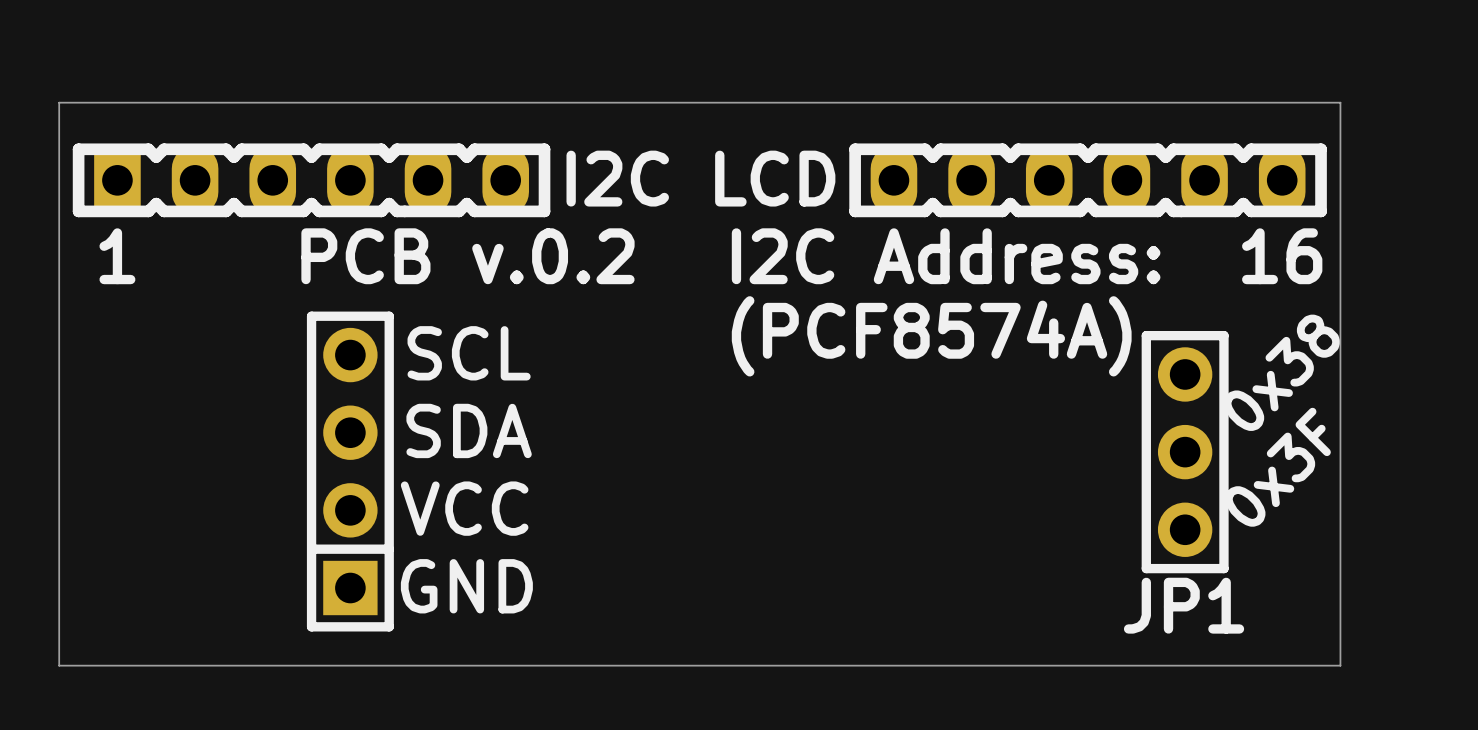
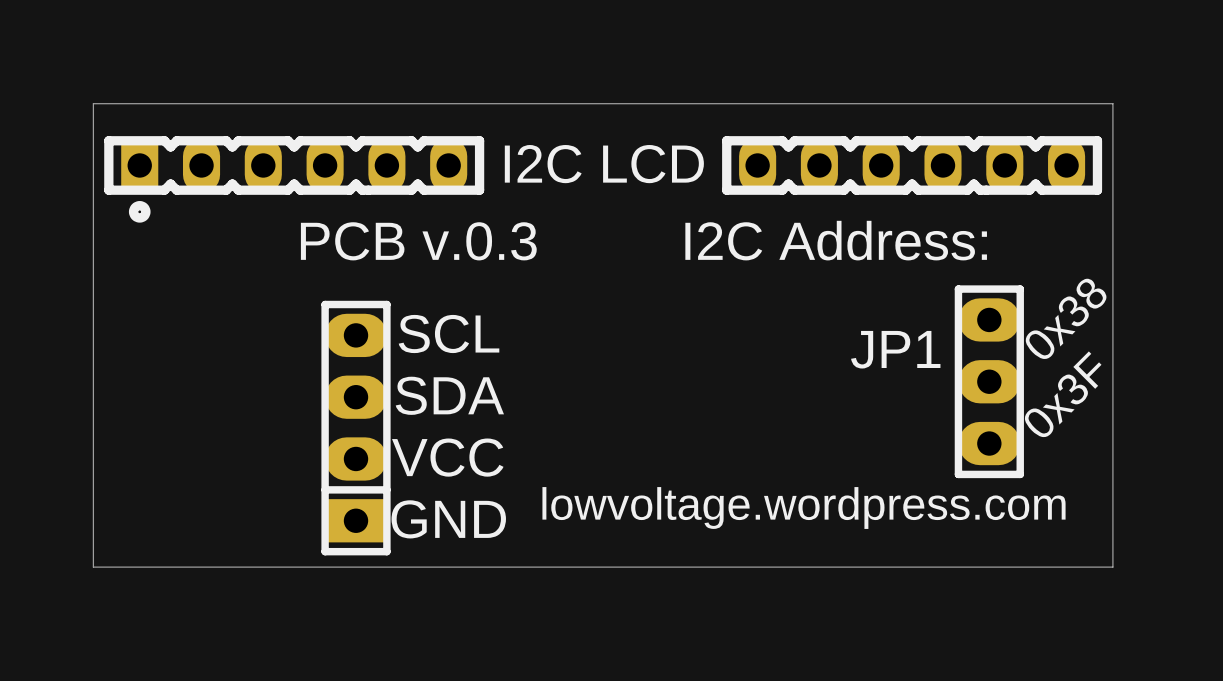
drawing: none -> [128, 201, 151, 223]
text: 1 (117, 256) -> none
text: PCB v.0.2 (467, 256) -> PCB v.0.3 (418, 241)
text position: I2C Address: (946, 256) -> I2C Address: (836, 240)
text: 16 (1282, 256) -> none
JP1 footprint: [1141, 330, 1229, 574] -> [954, 285, 1024, 479]
text: (PCF8574A) (931, 336) -> none
text position: SCL (469, 353) -> SCL (449, 334)
text position: SDA (469, 430) -> SDA (449, 395)
part: (350, 471) -> none
text position: VCC (464, 508) -> VCC (447, 457)
part: none -> (356, 428)
text position: GND (466, 586) -> GND (448, 519)
JP1 name position: JP1 (1184, 605) -> JP1 (895, 349)
text: none -> lowvoltage.wordpress.com (804, 508)
board edge: (59, 665) (1340, 665) -> (93, 551) (93, 567) (1112, 567) (1112, 551)

